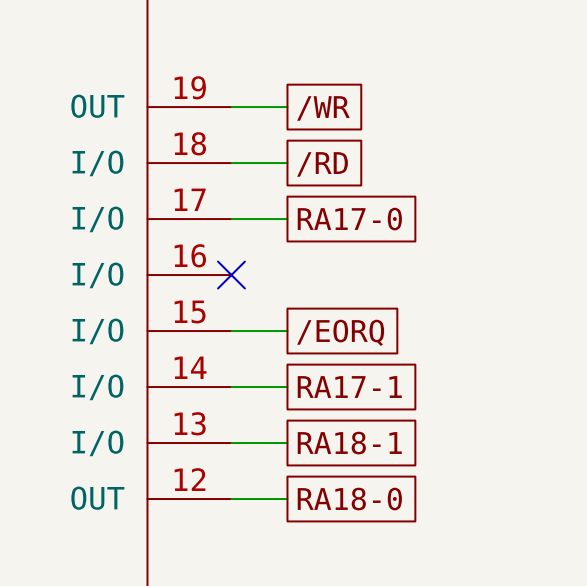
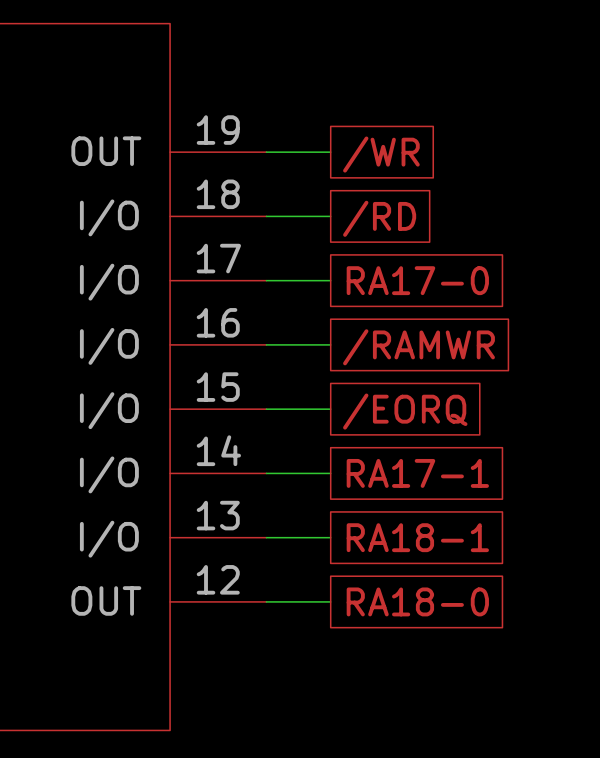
wire: none -> (266, 344) (330, 344)
no-connect mark: (231, 275) -> none
global label: none -> /RAMWR (419, 347)

